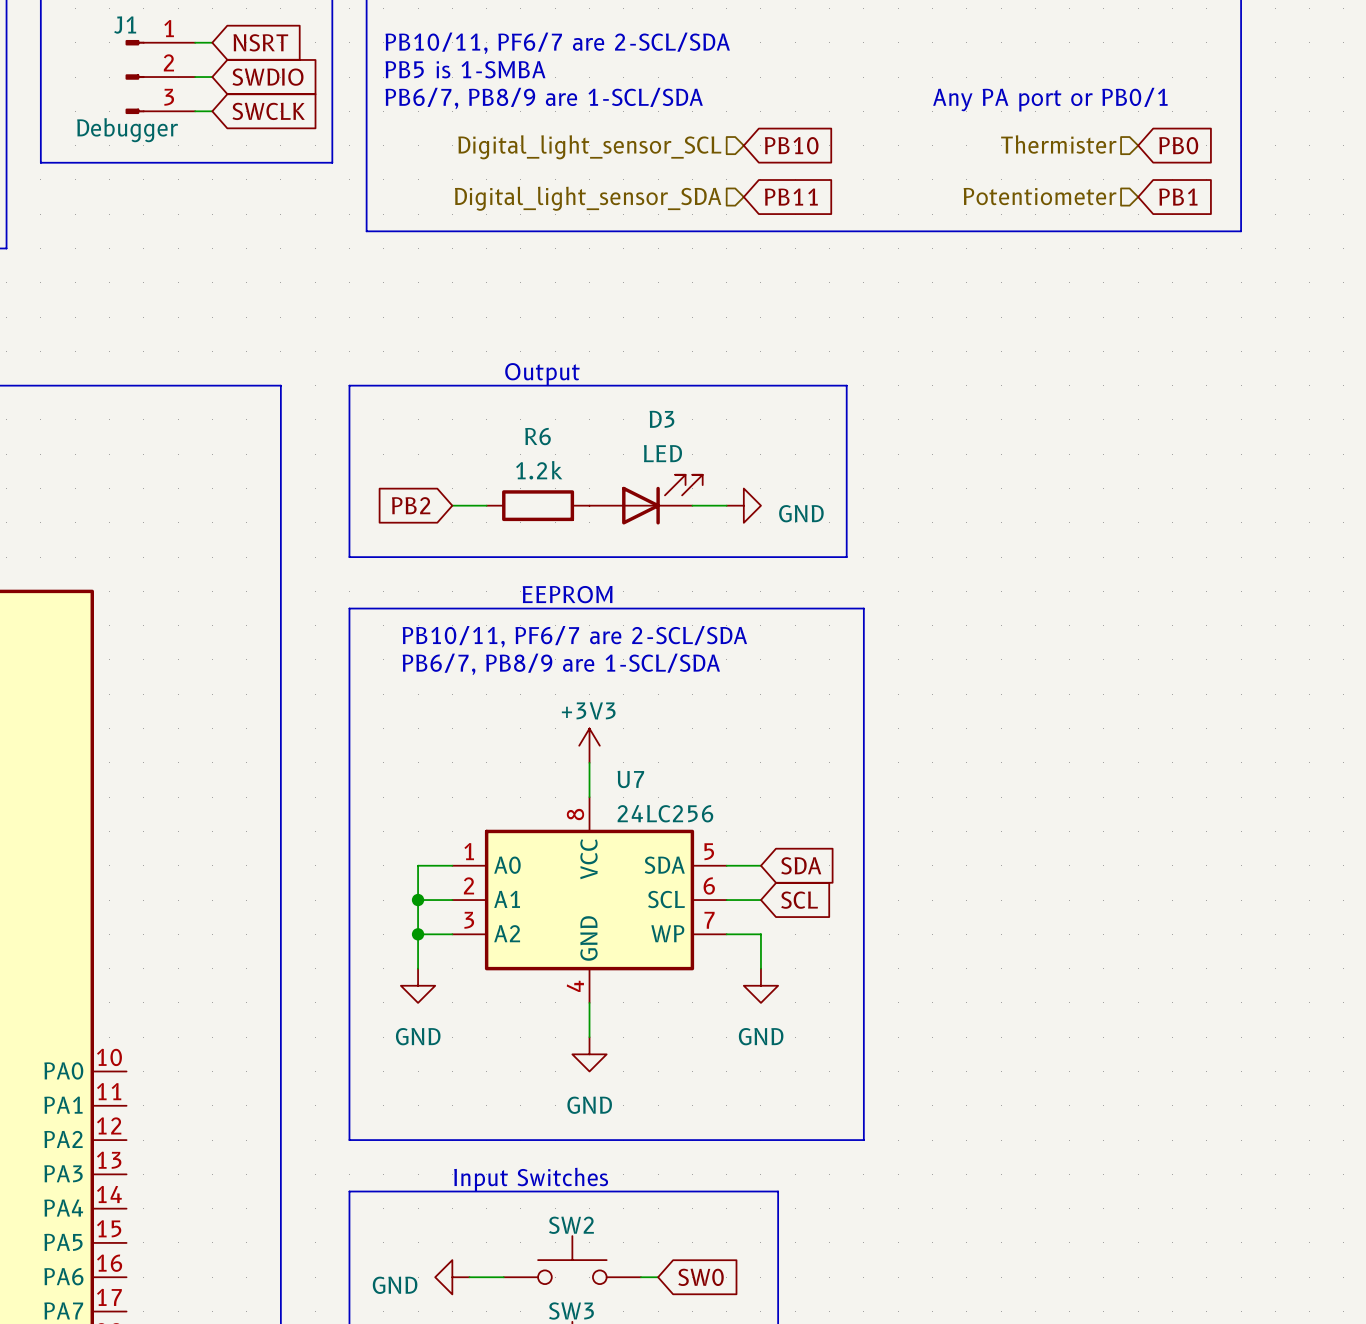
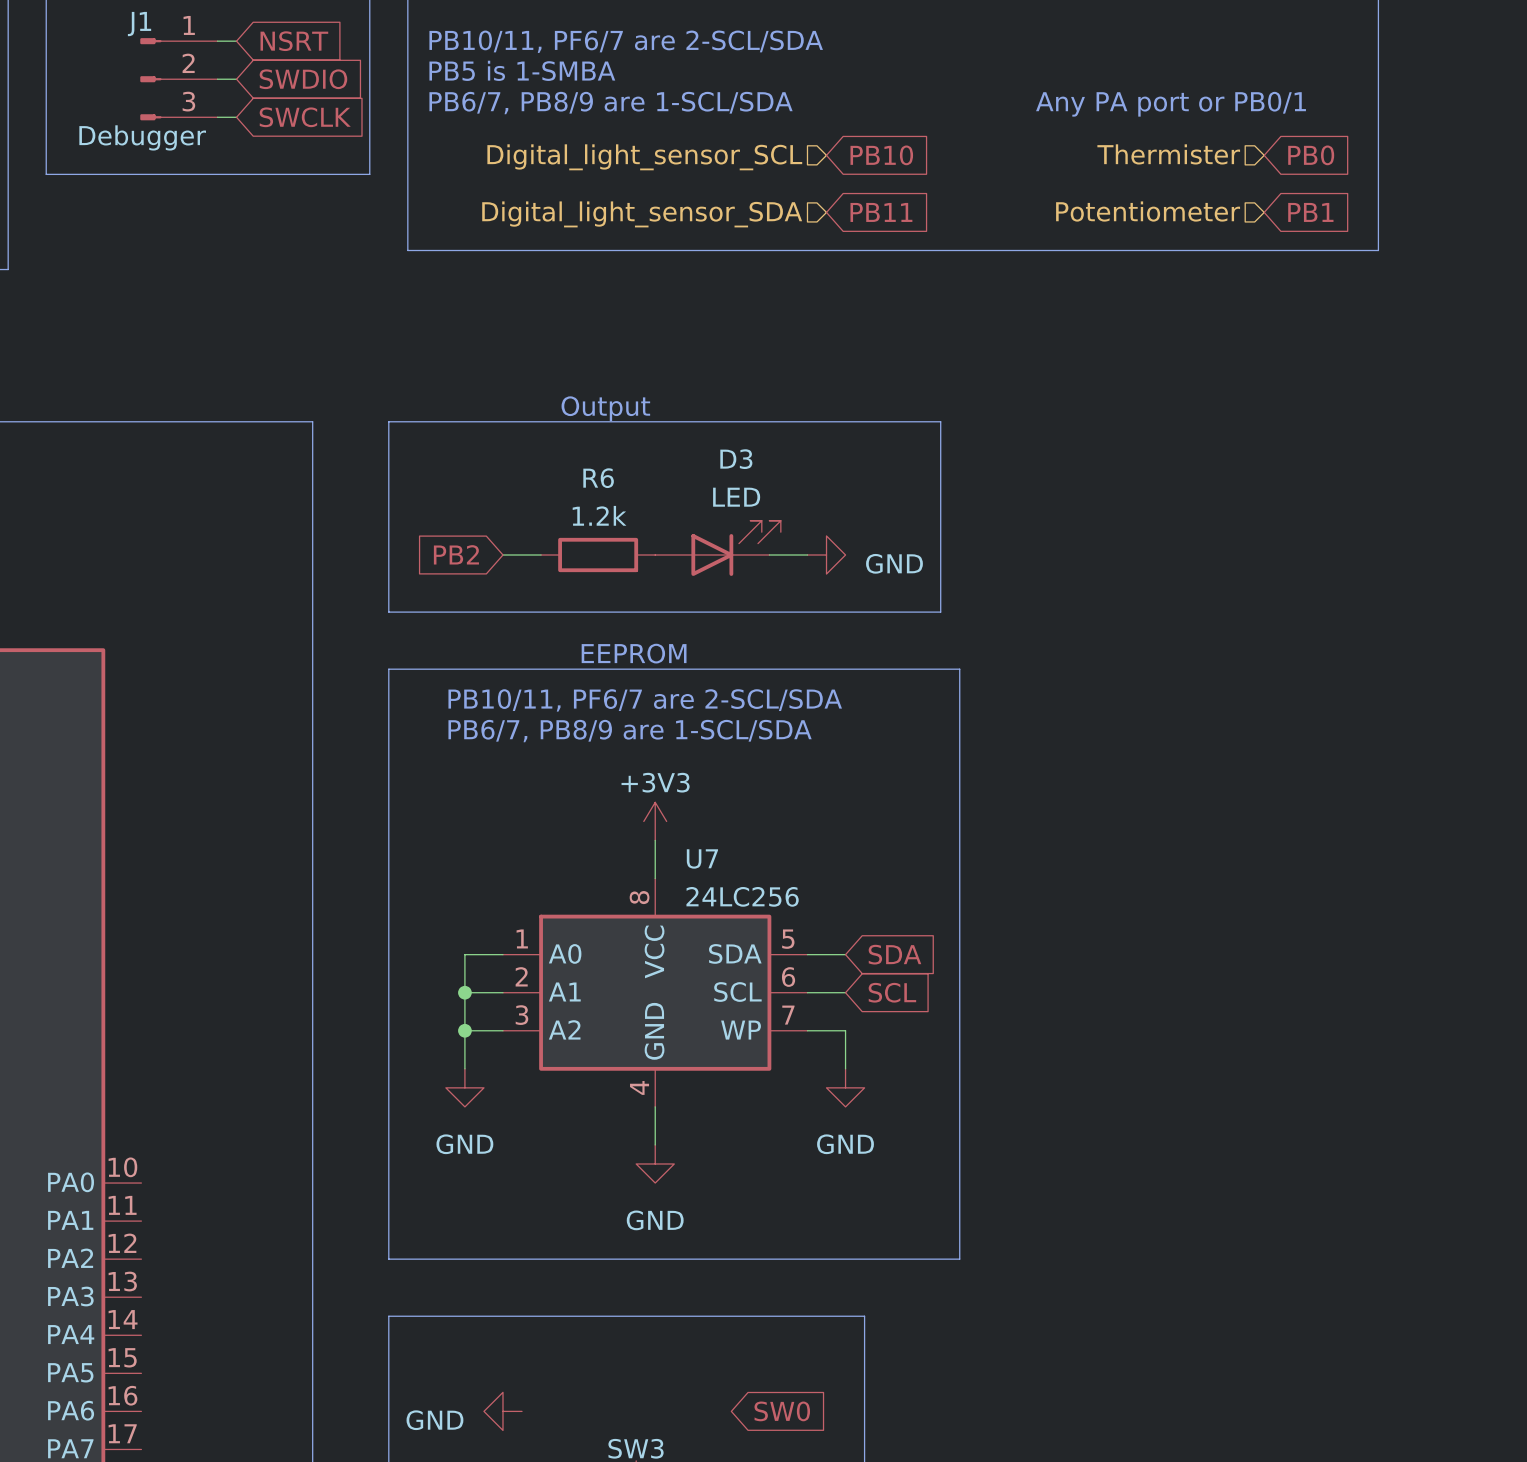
text: Input Switches (531, 1179) -> none
SW2: (572, 1260) -> none
wire: (469, 1277) (503, 1277) -> none
wire: (640, 1277) (658, 1277) -> none

